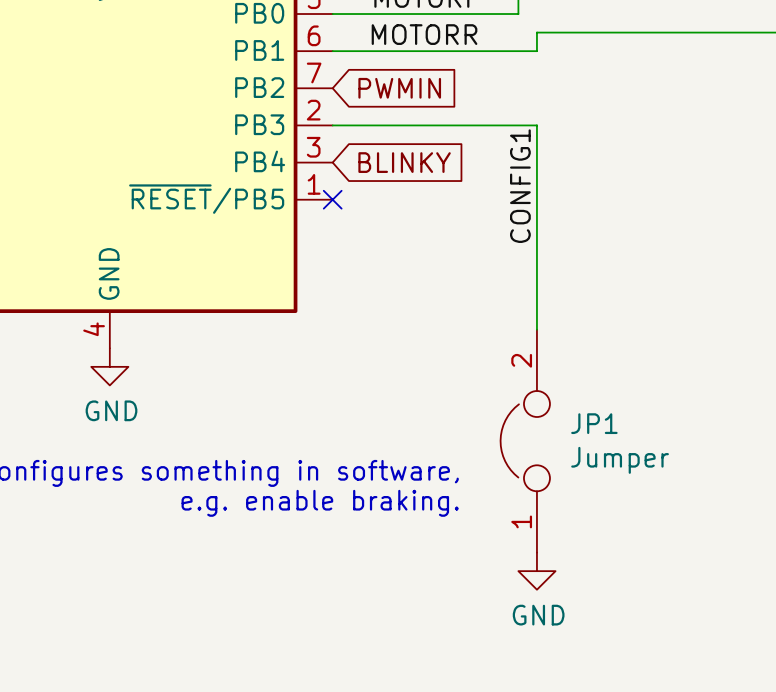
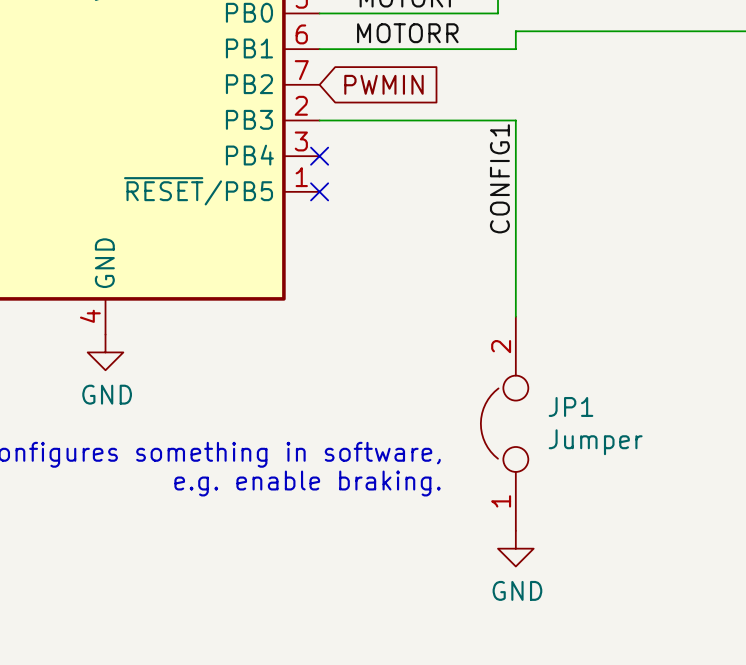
no-connect mark: none -> (319, 156)
global label: BLINKY (404, 162) -> none

